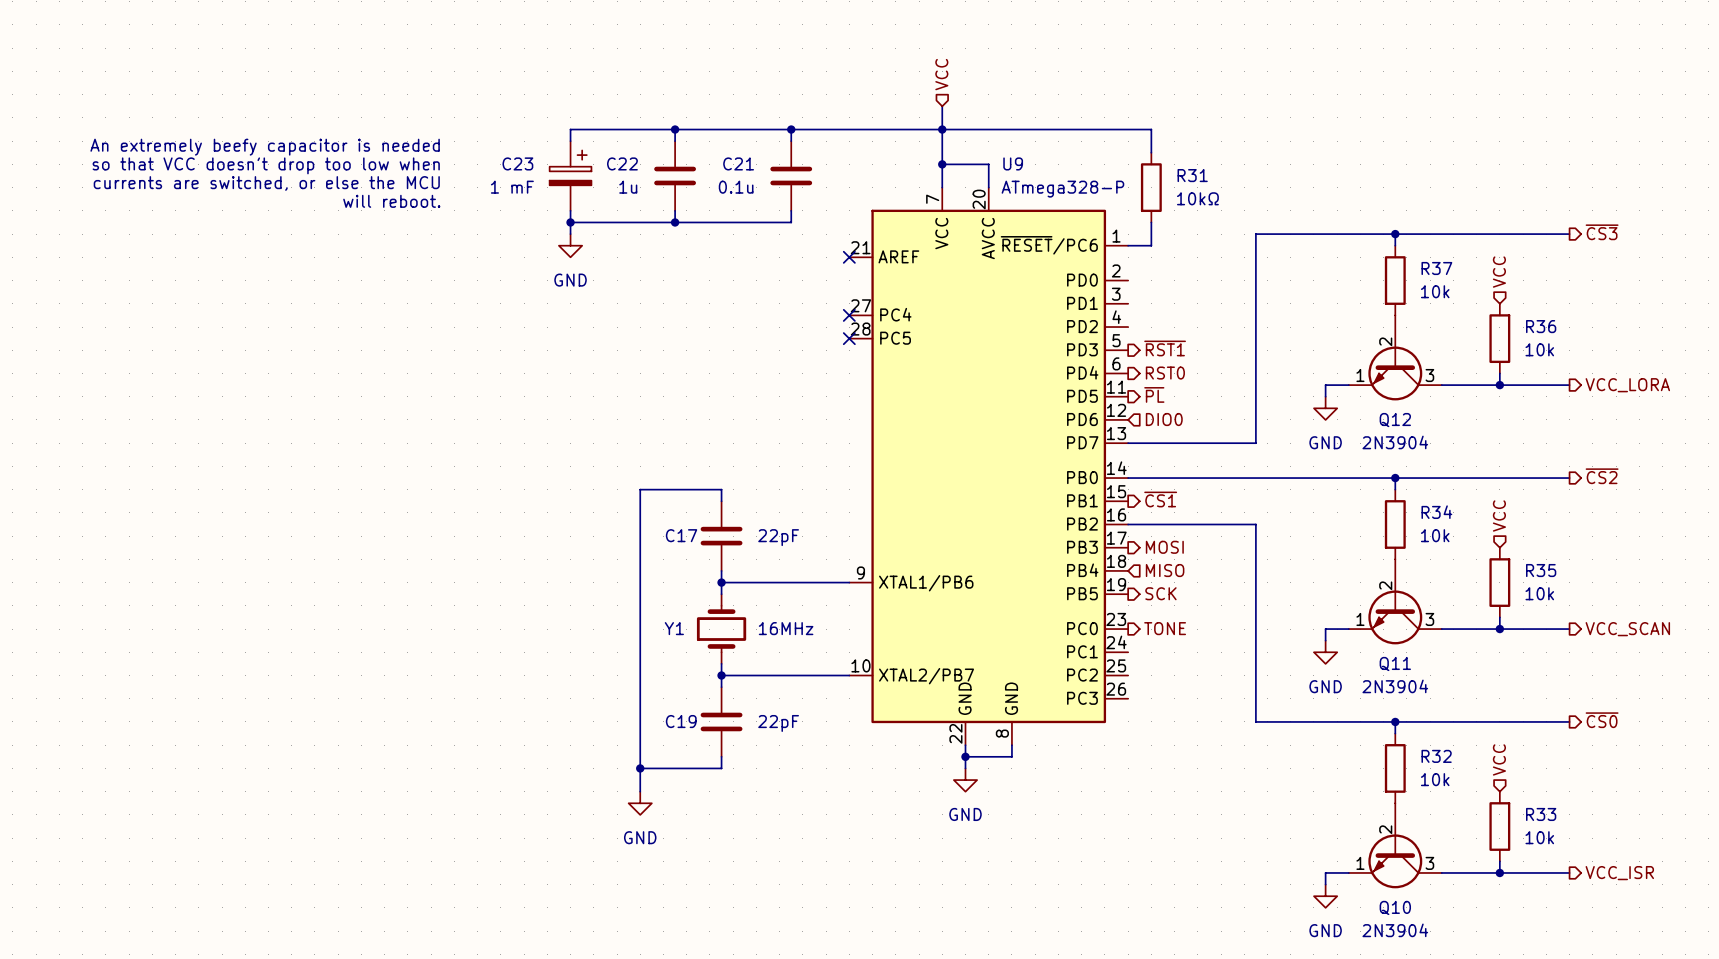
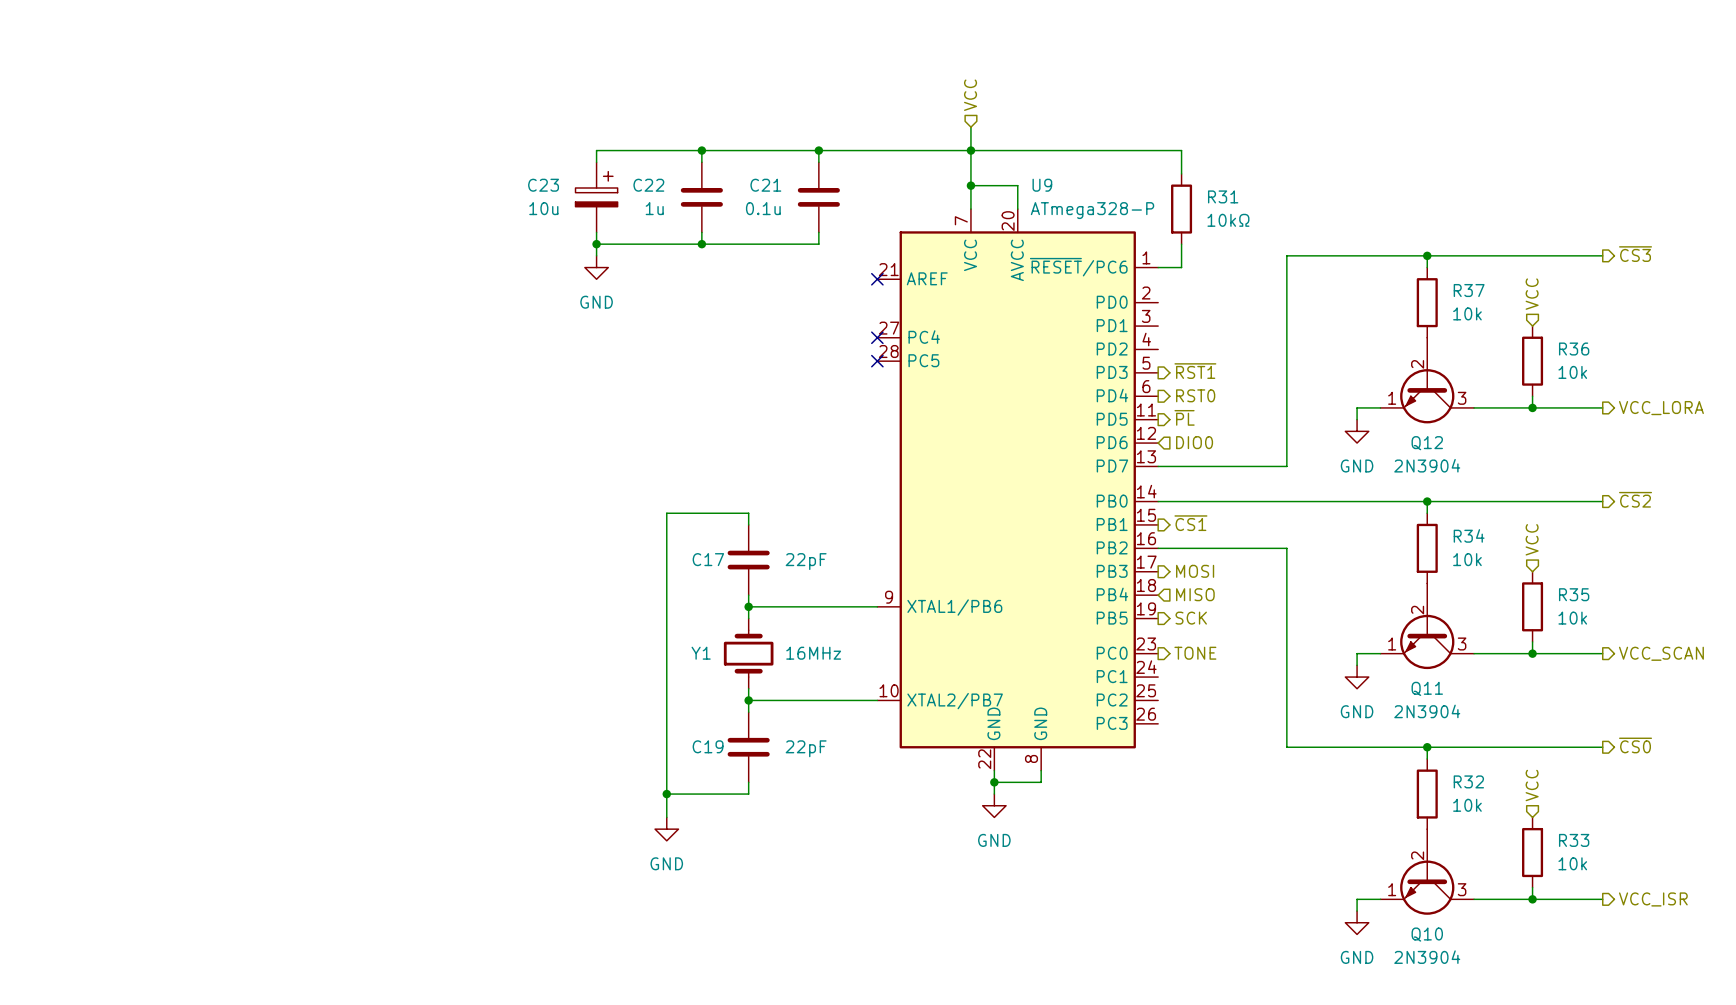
text: An extremely beefy capacitor is needed (265, 147) -> none
text: so that VCC doesn't drop too low when (266, 165) -> none
text: currents are switched, or else the MCU (266, 183) -> none
C23 value: 1 mF (512, 187) -> 10u (543, 208)
text: will reboot. (391, 201) -> none

